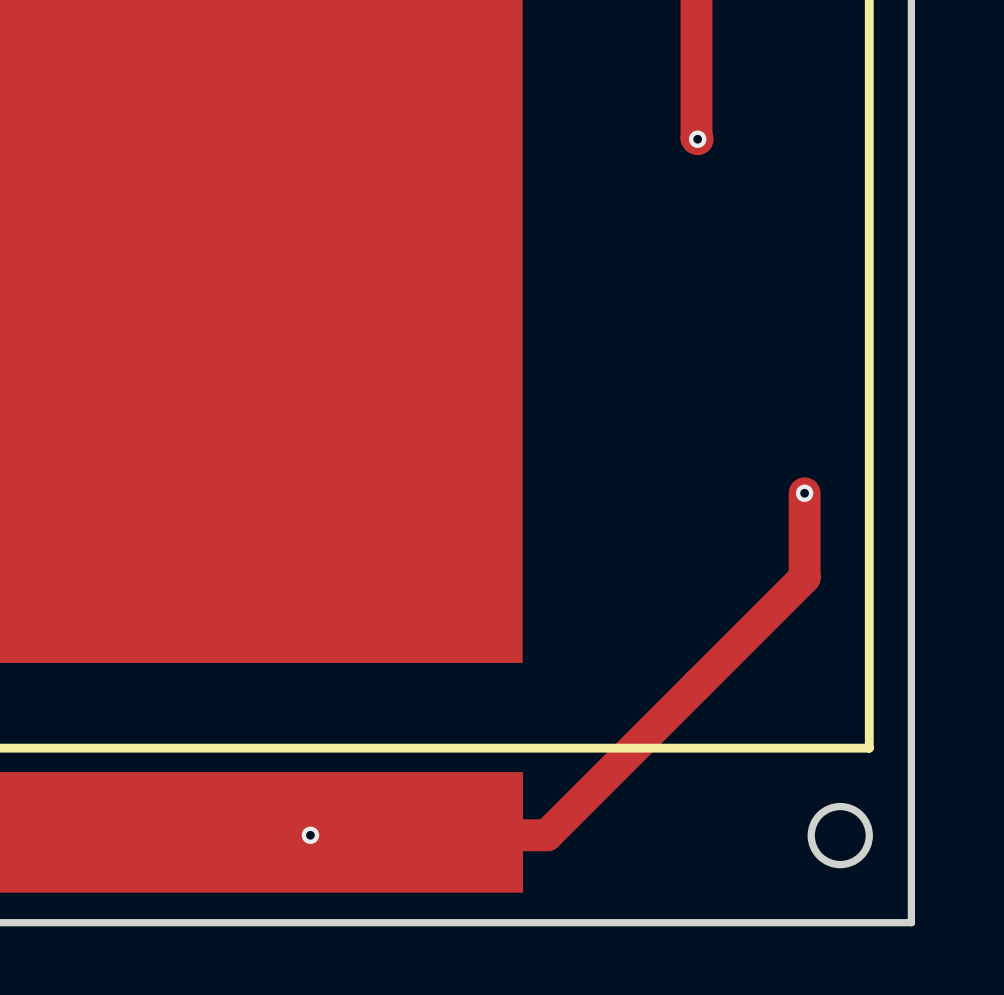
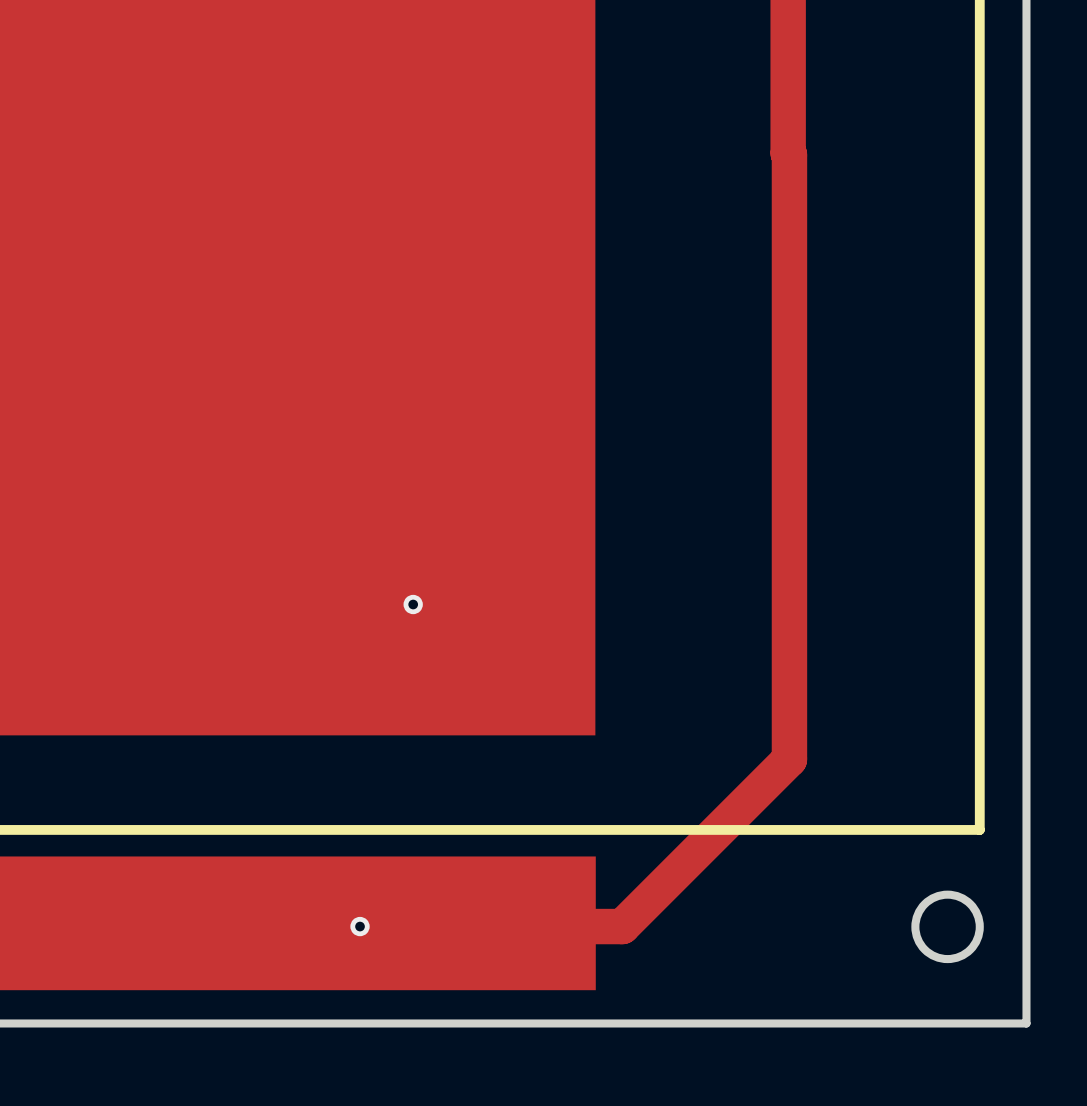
via: (697, 139) -> none
track: (804, 493) (804, 577) (697, 684) -> (789, 154) (789, 759)
via: (804, 493) -> none
via: none -> (413, 604)

